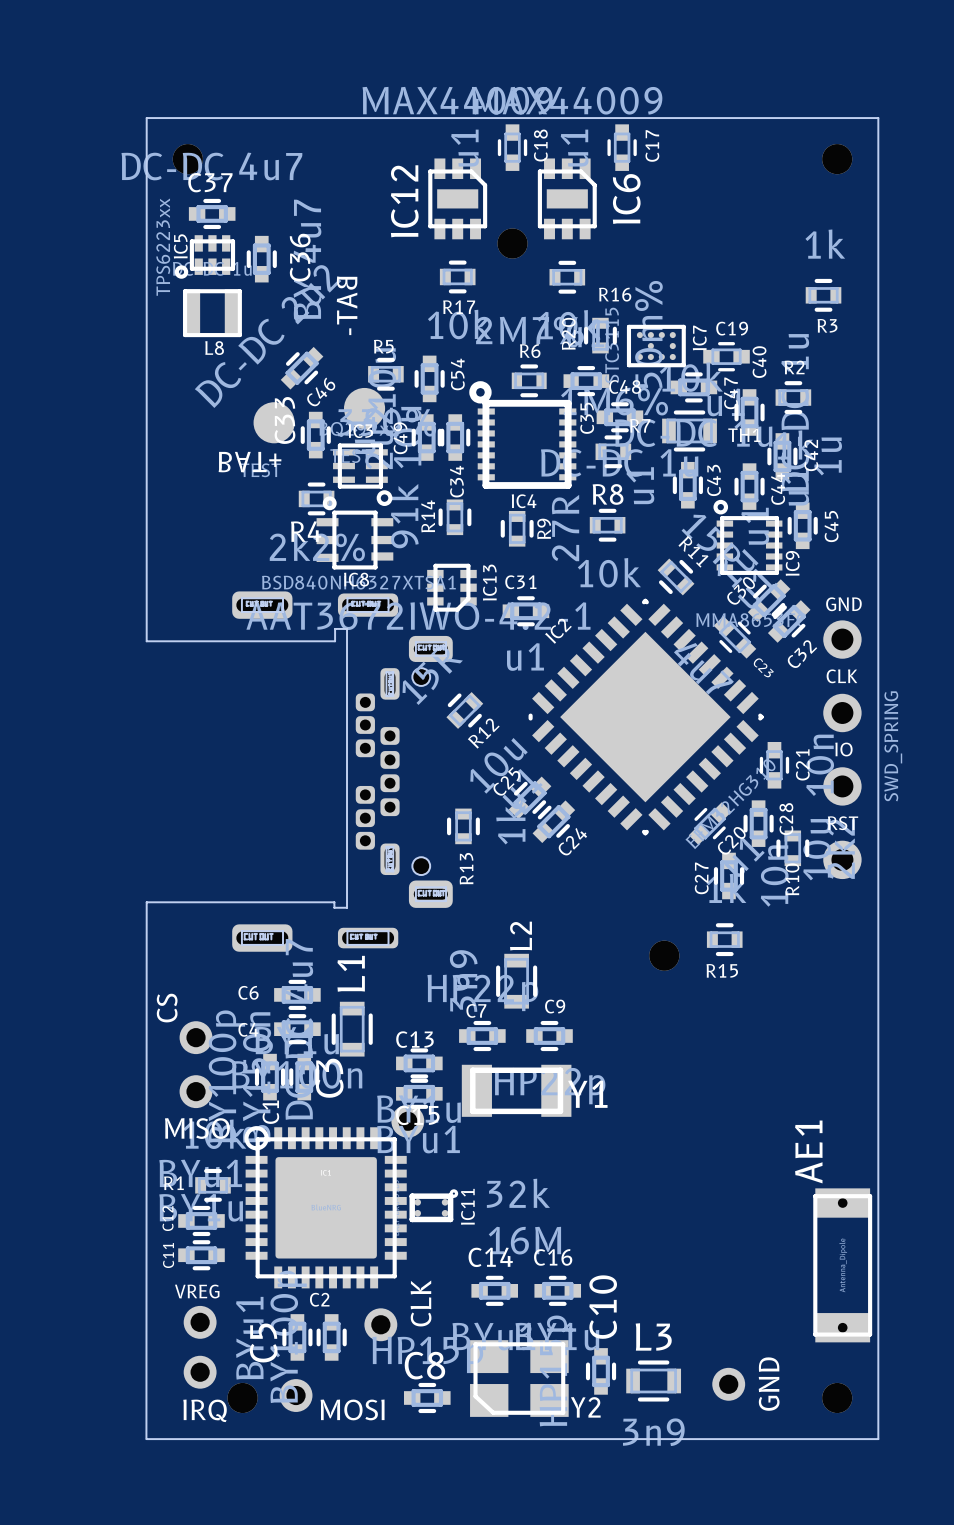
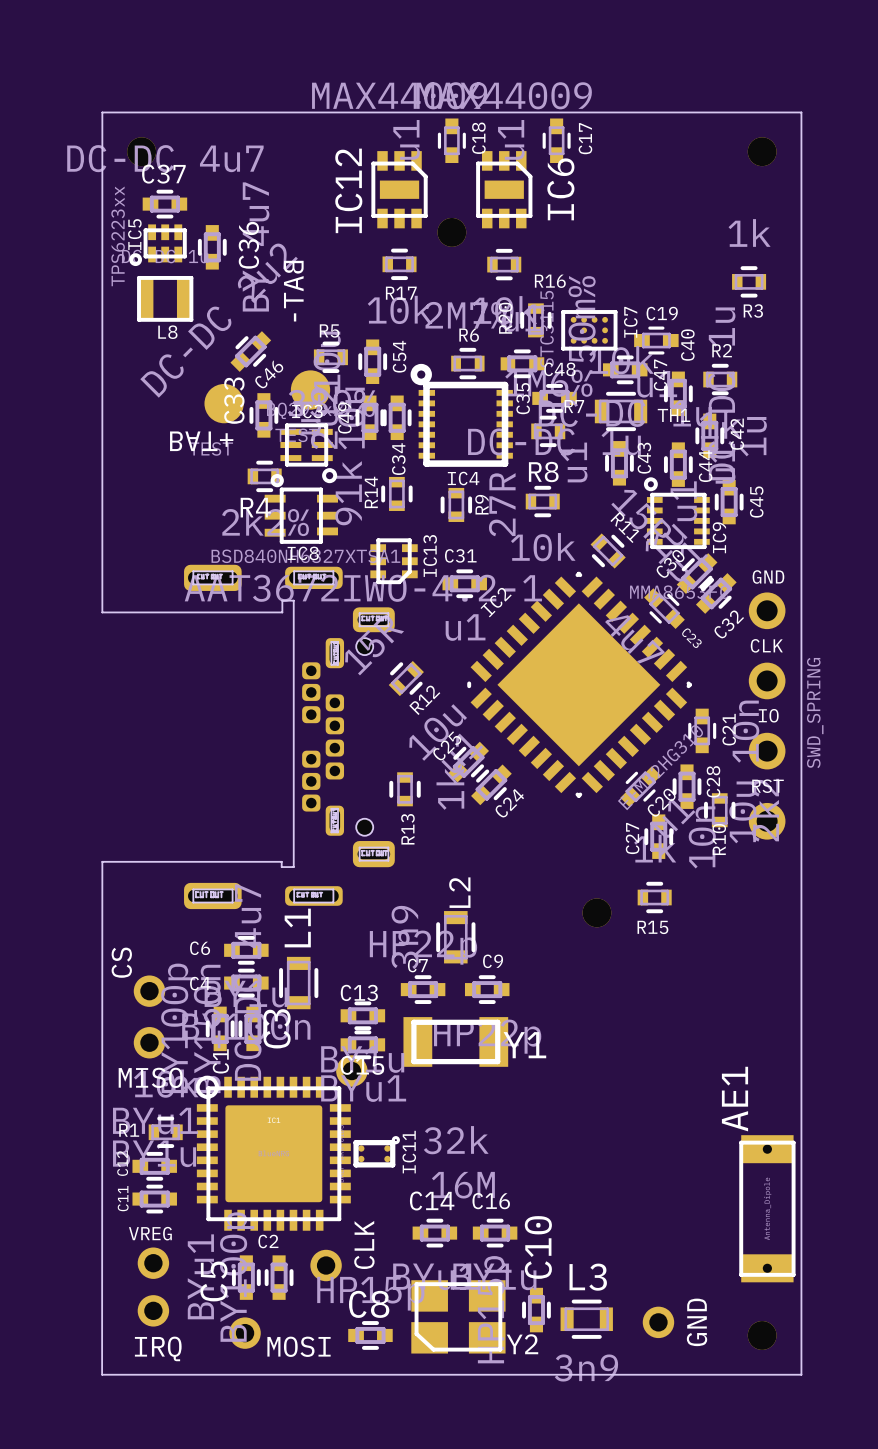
part: (242, 1397) -> none

